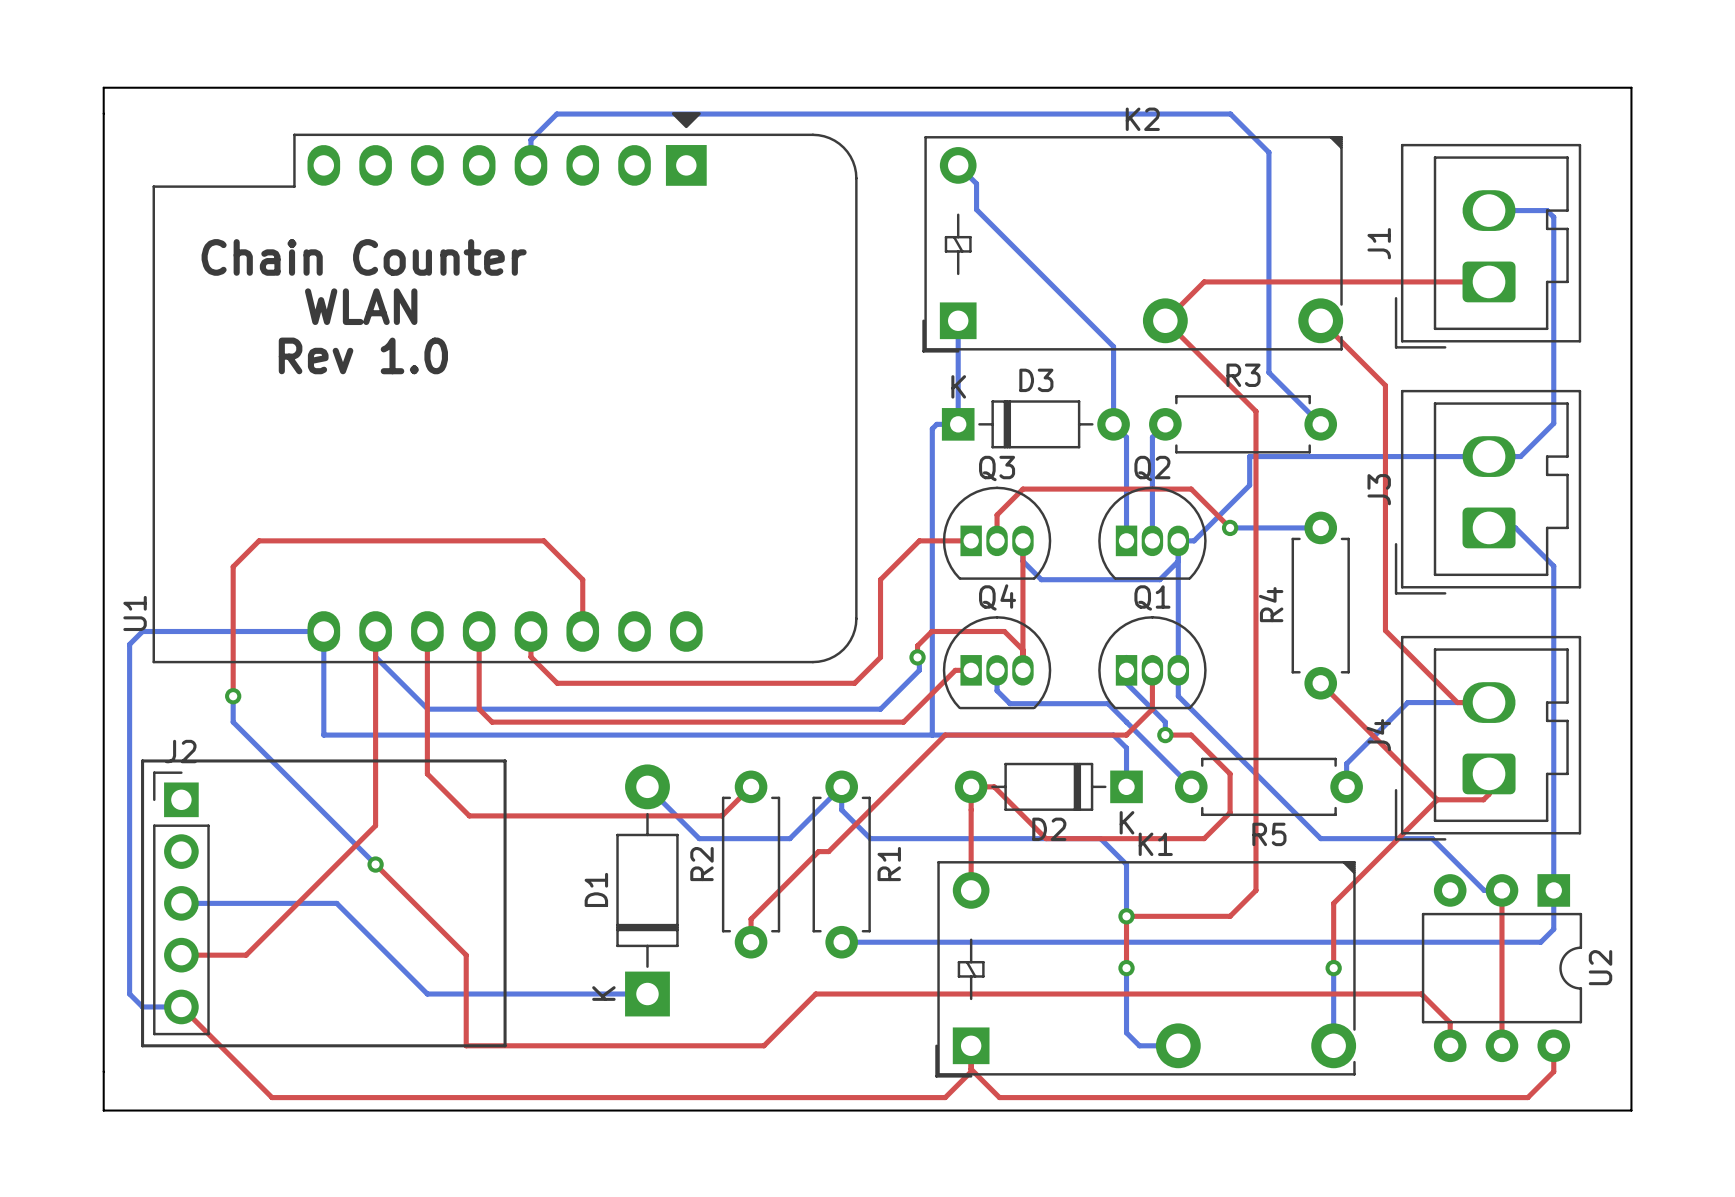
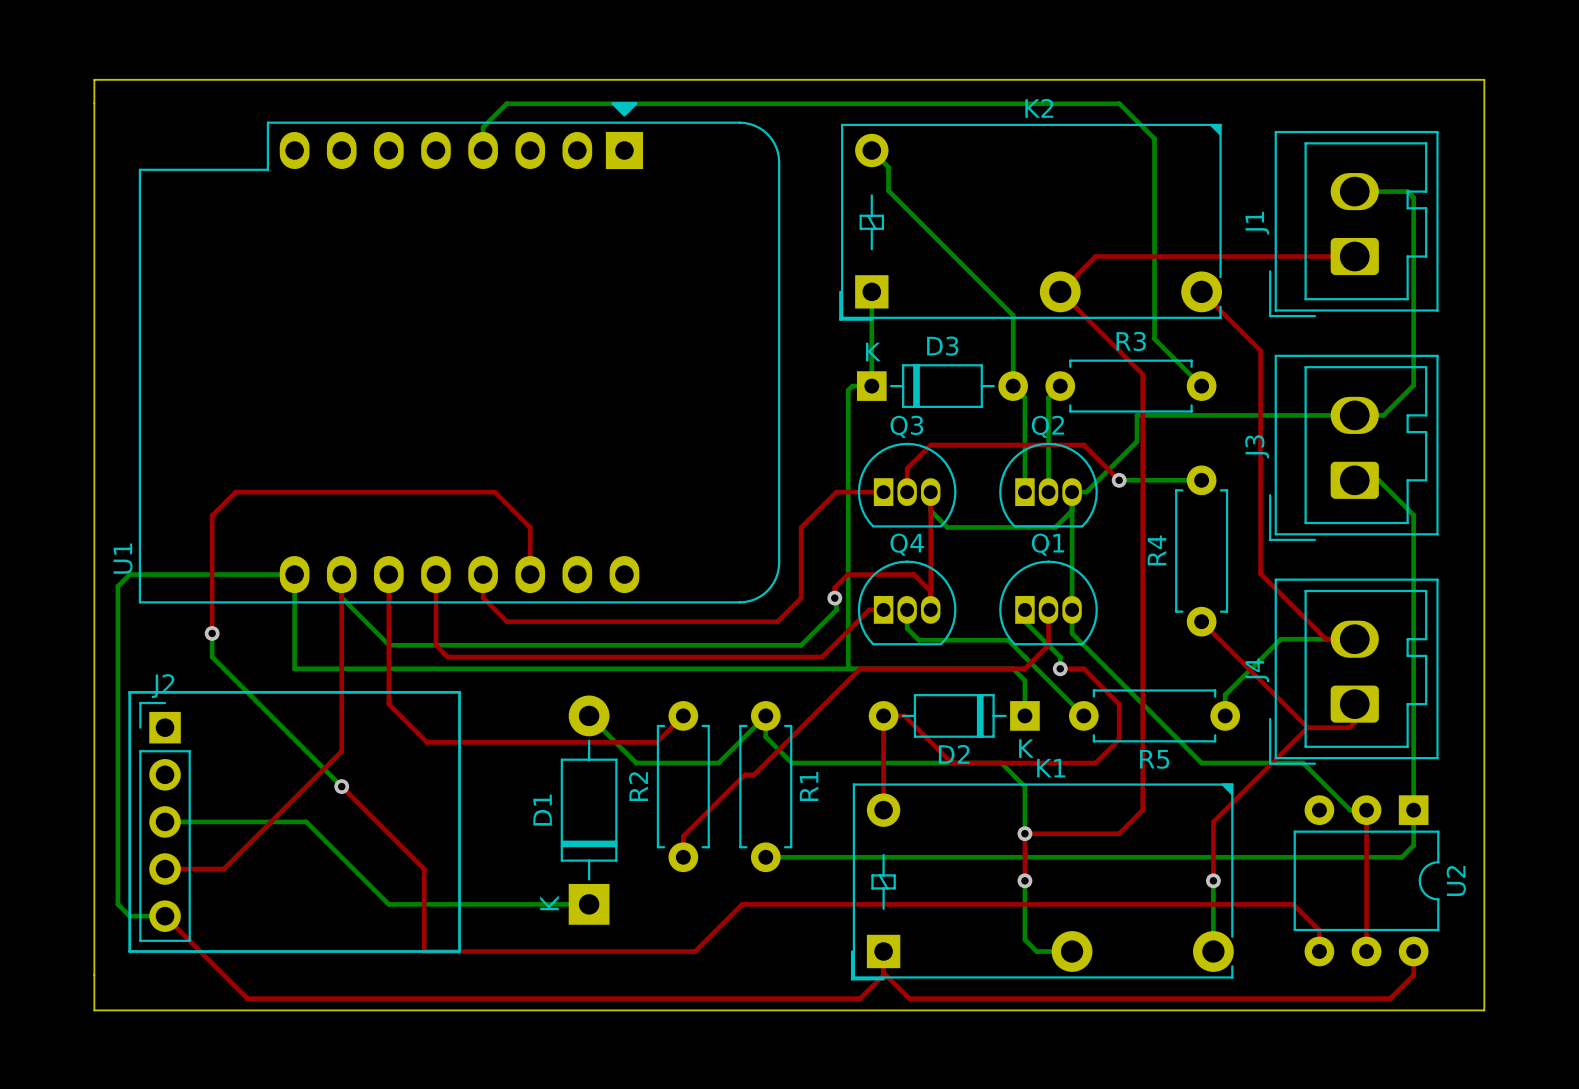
text: Chain Counter (364, 257) -> none
text: WLAN (361, 306) -> none
text: Rev 1.0 (363, 355) -> none

